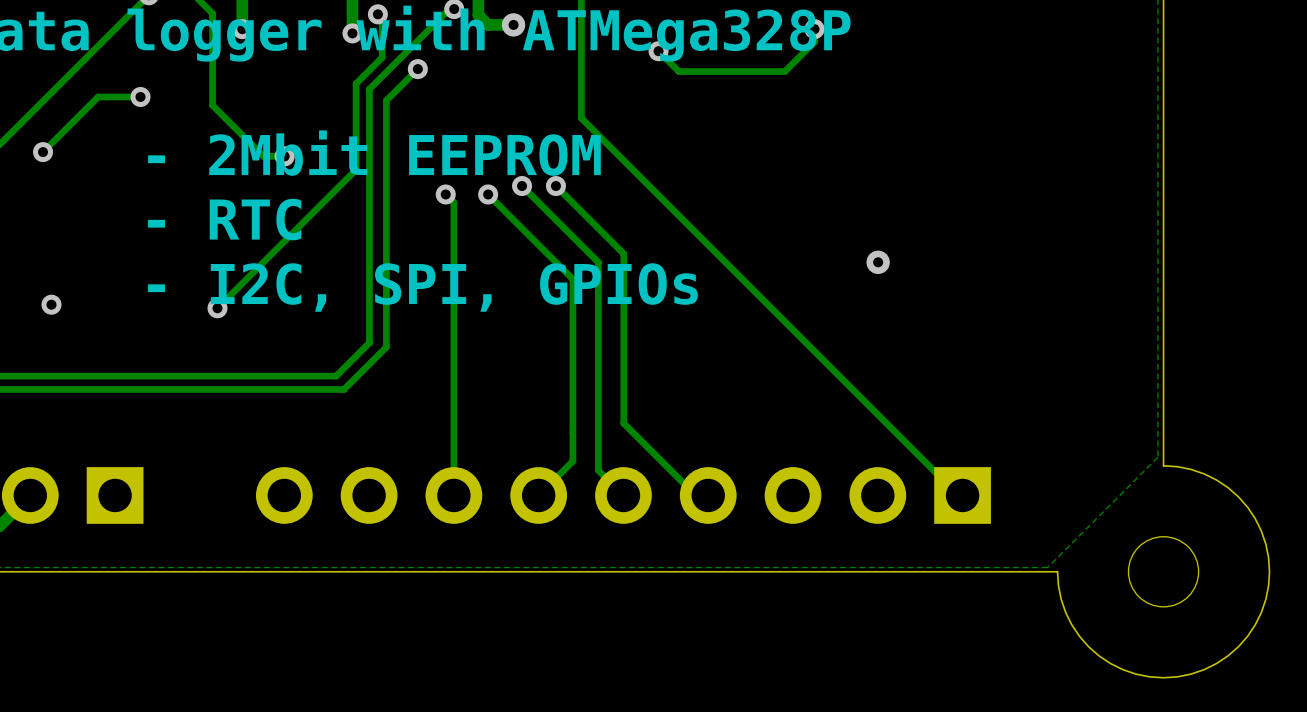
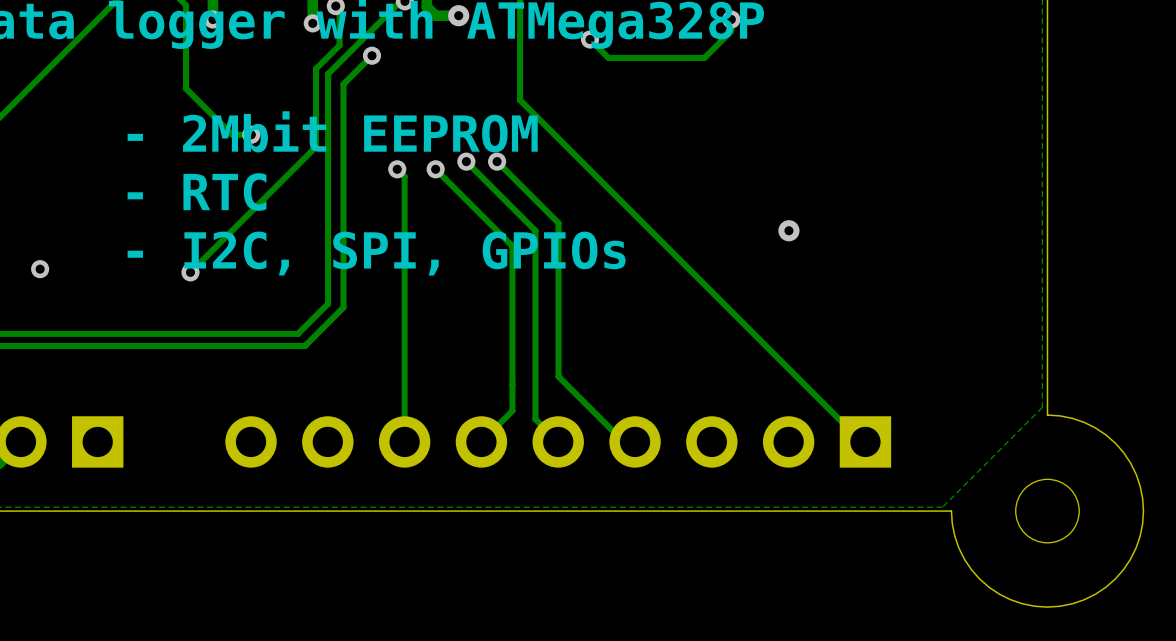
track: (140, 96) (98, 96) (43, 152) -> none
via: (140, 96) -> none
via: (43, 152) -> none

